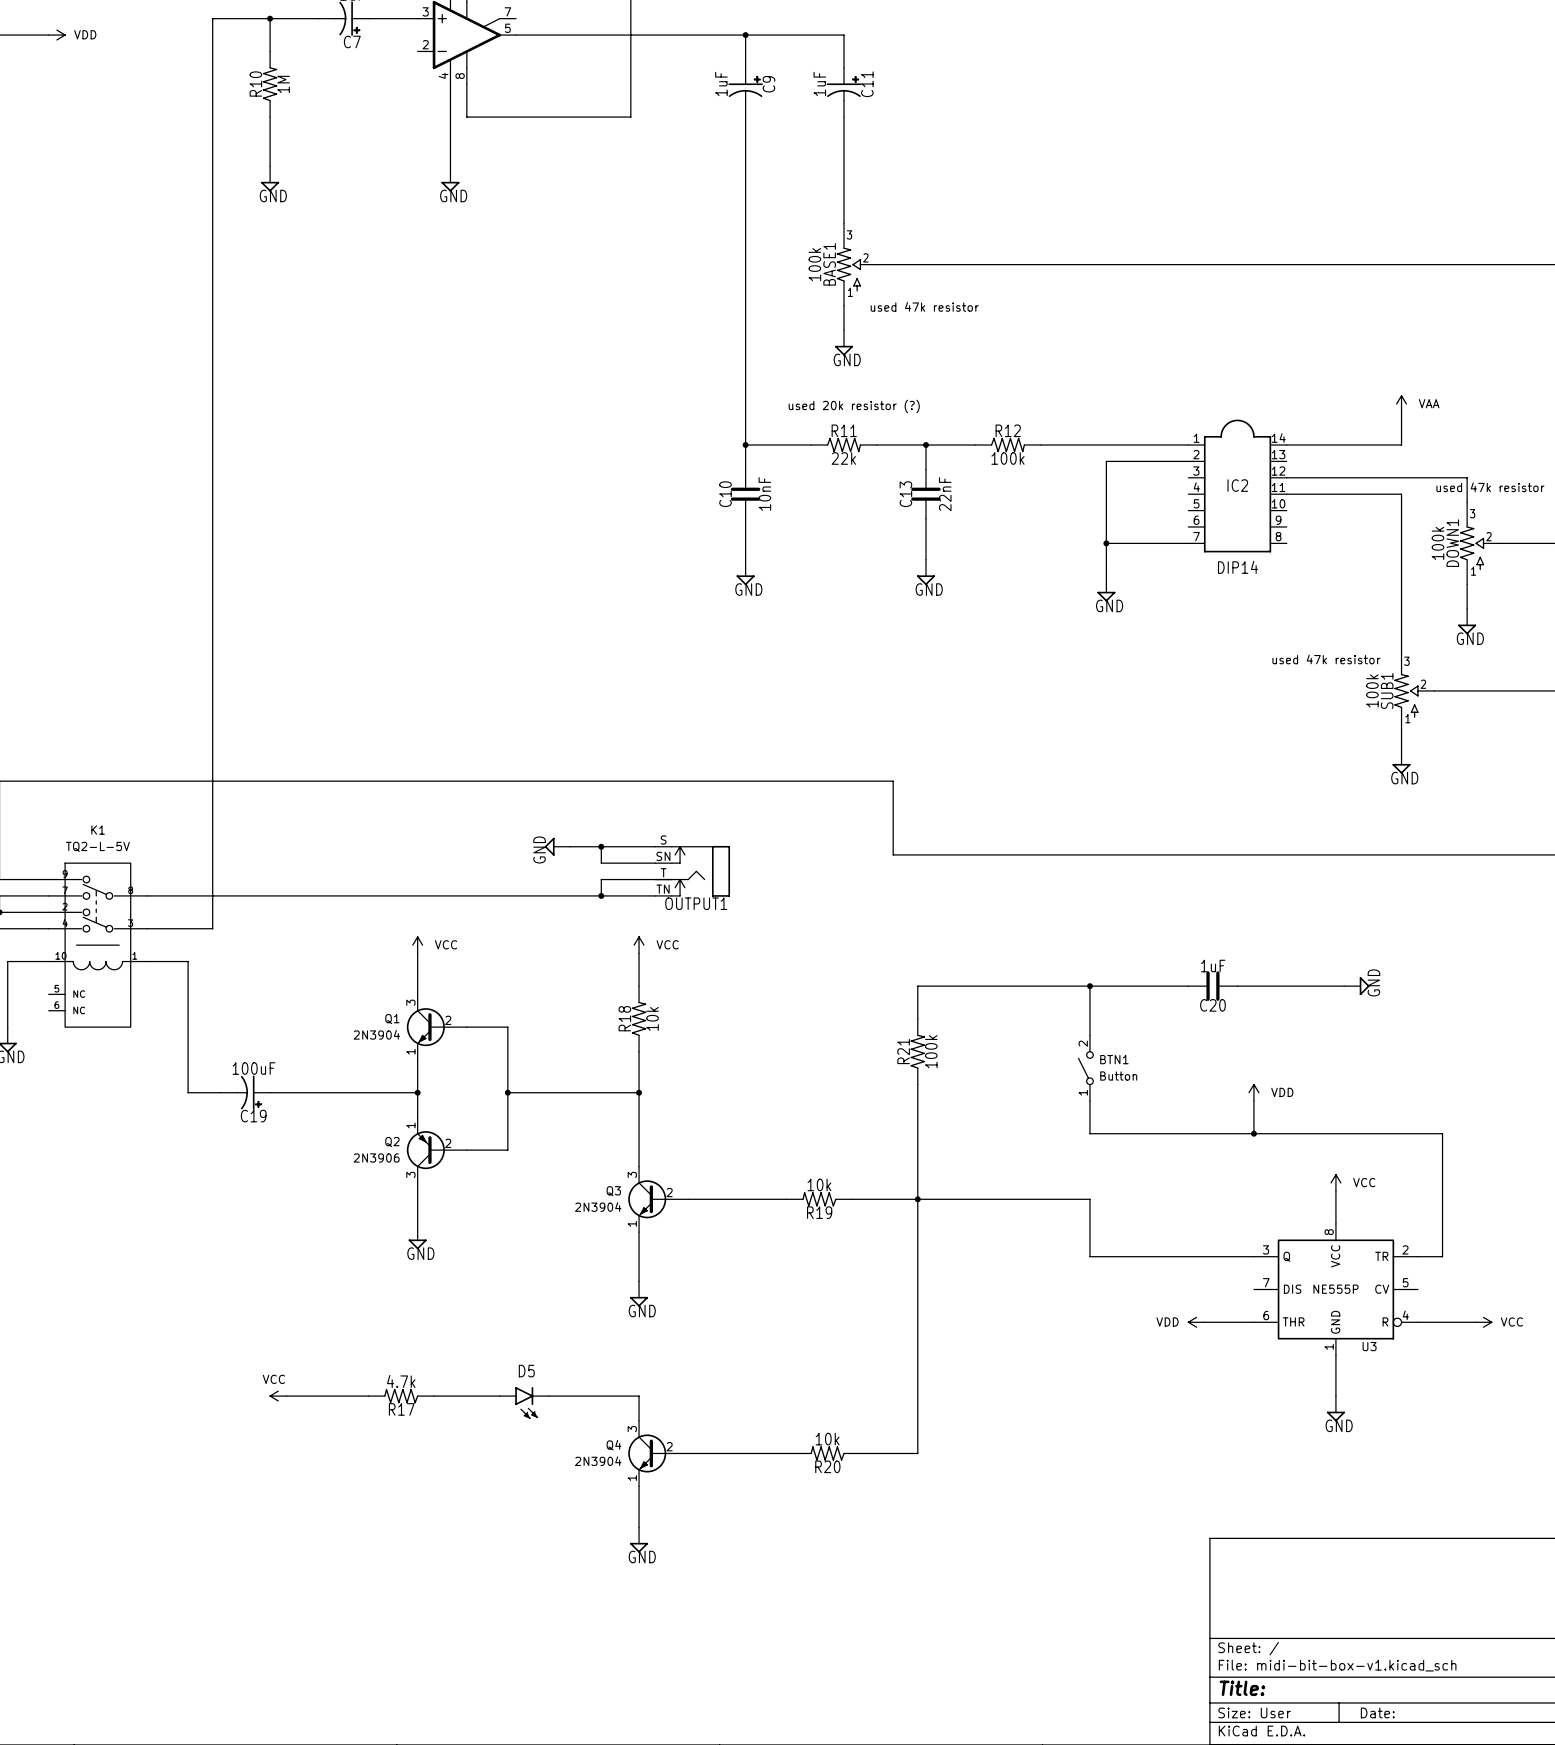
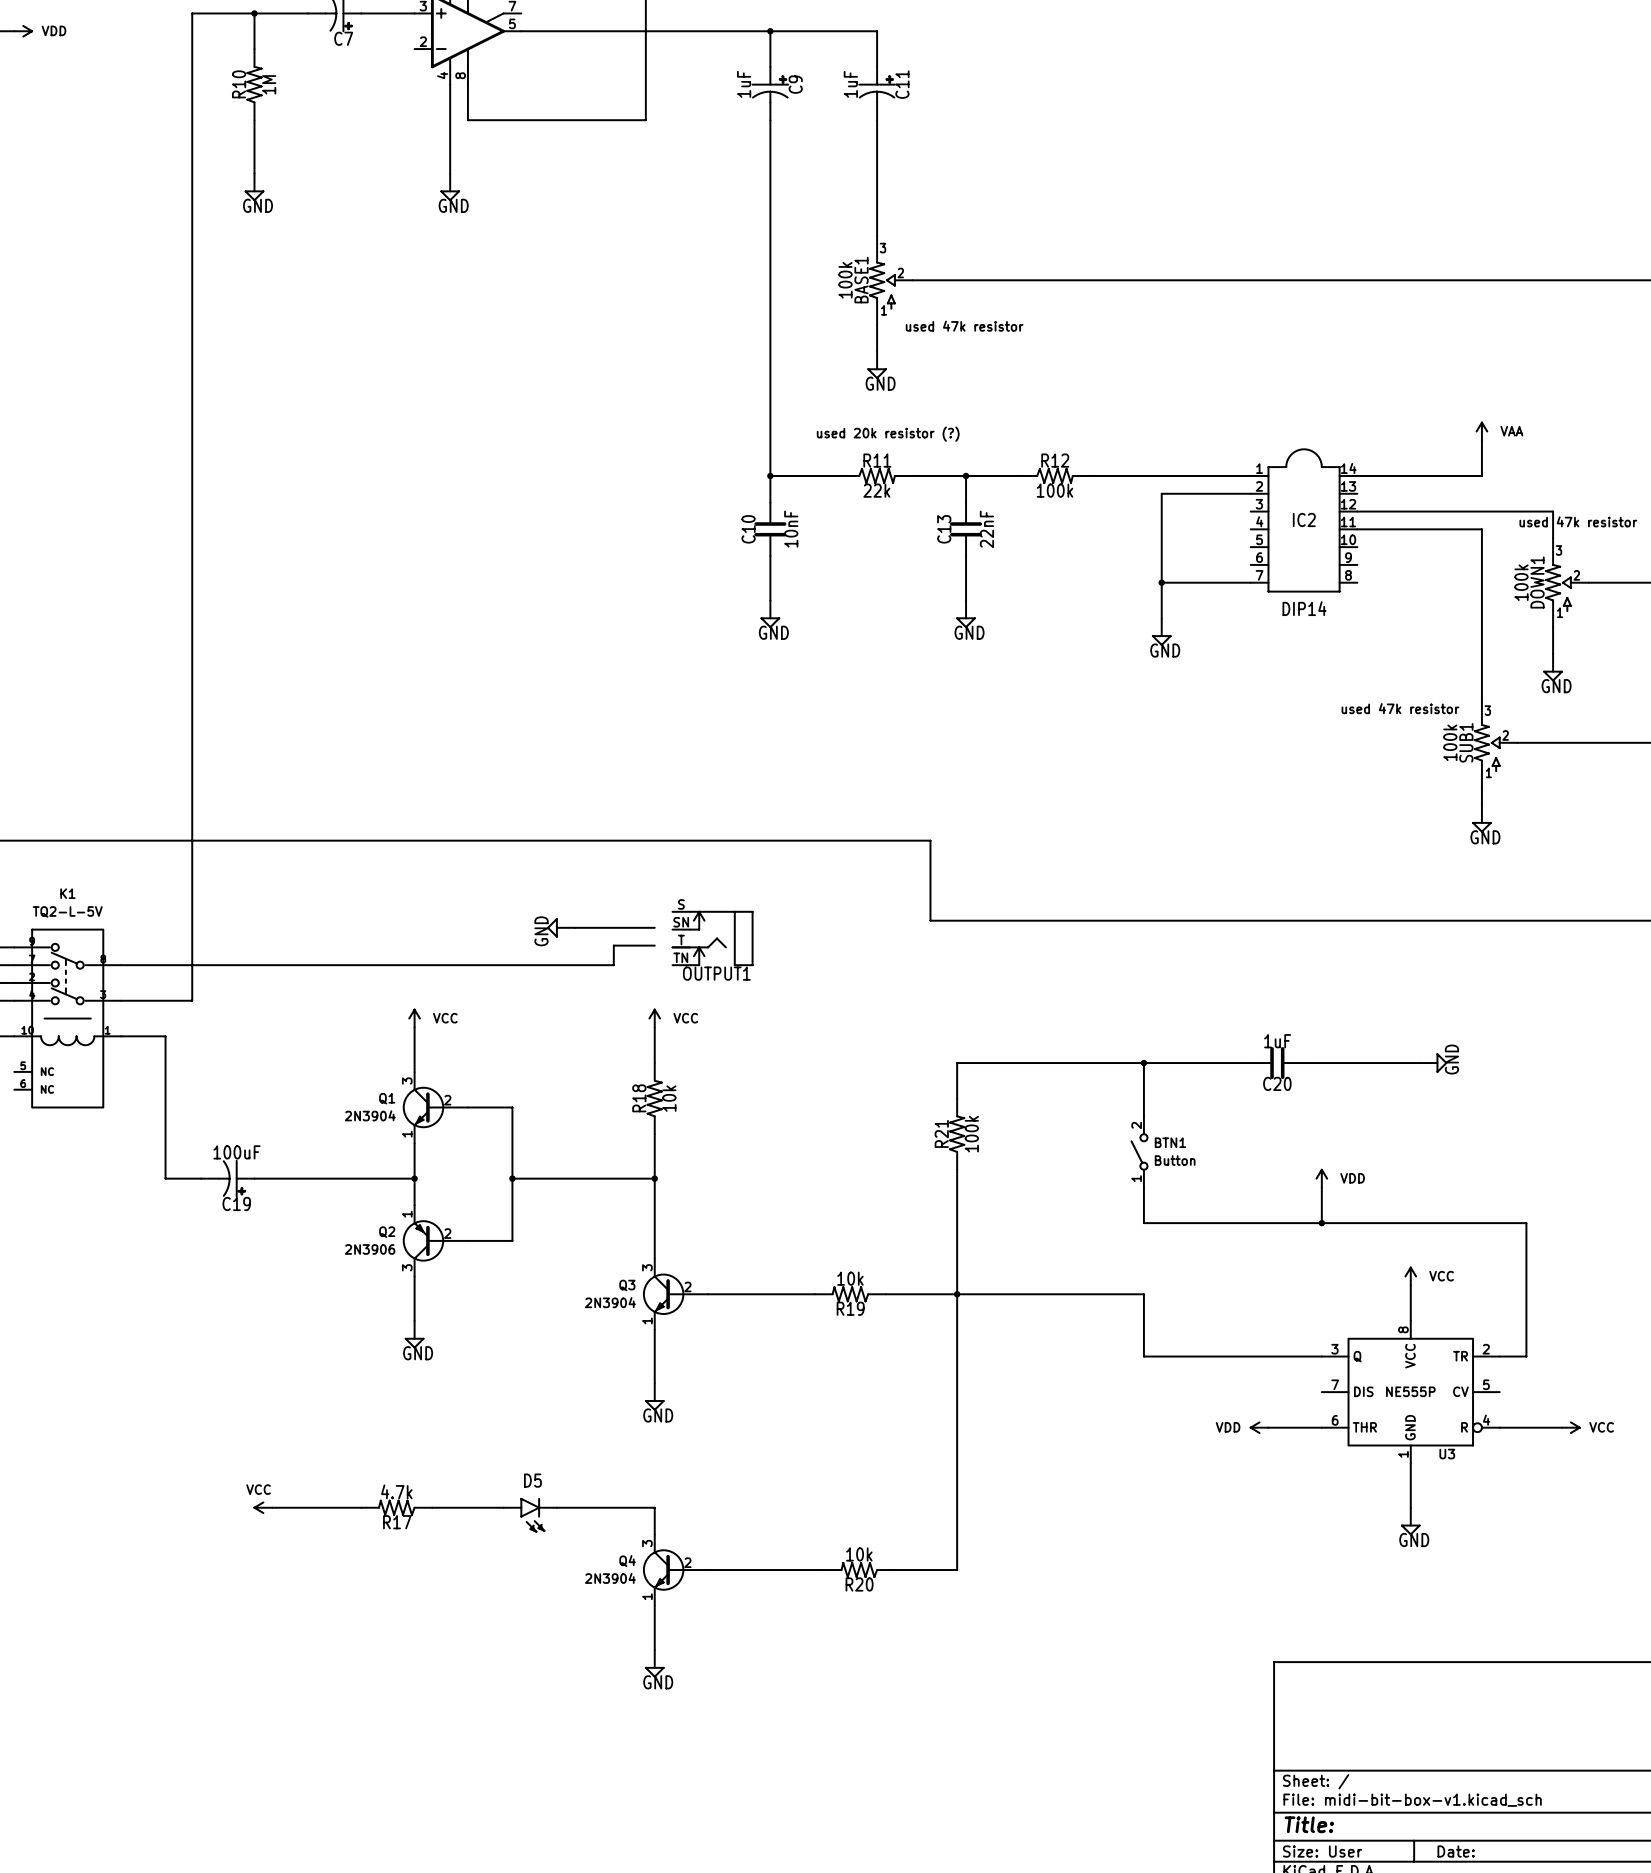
power symbol position: GND (557, 846) -> GND (560, 927)
wire: (570, 846) (655, 846) -> none
wire: (601, 846) (601, 863) (655, 863) -> none
junction: (601, 846) -> none
wire: none -> (574, 927) (654, 927)
wire: (601, 879) (655, 879) -> (613, 947) (613, 945) (654, 945)
wire: (601, 895) (655, 895) -> none
junction: (601, 895) -> none

